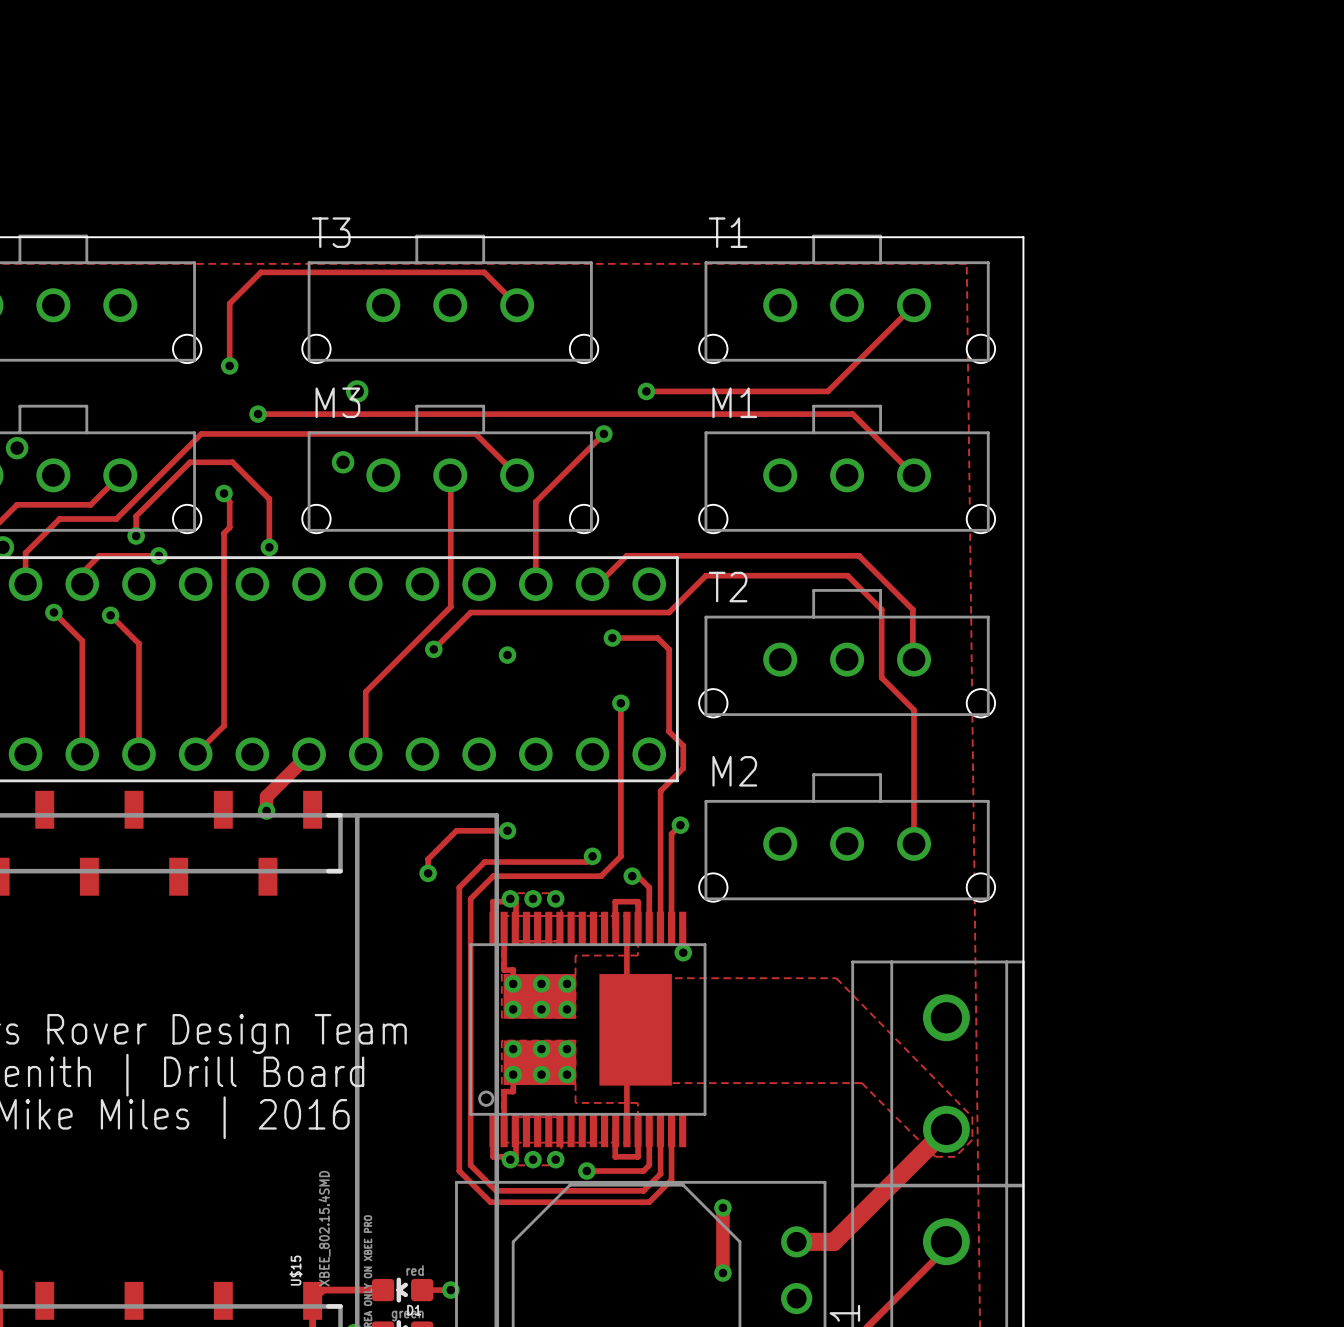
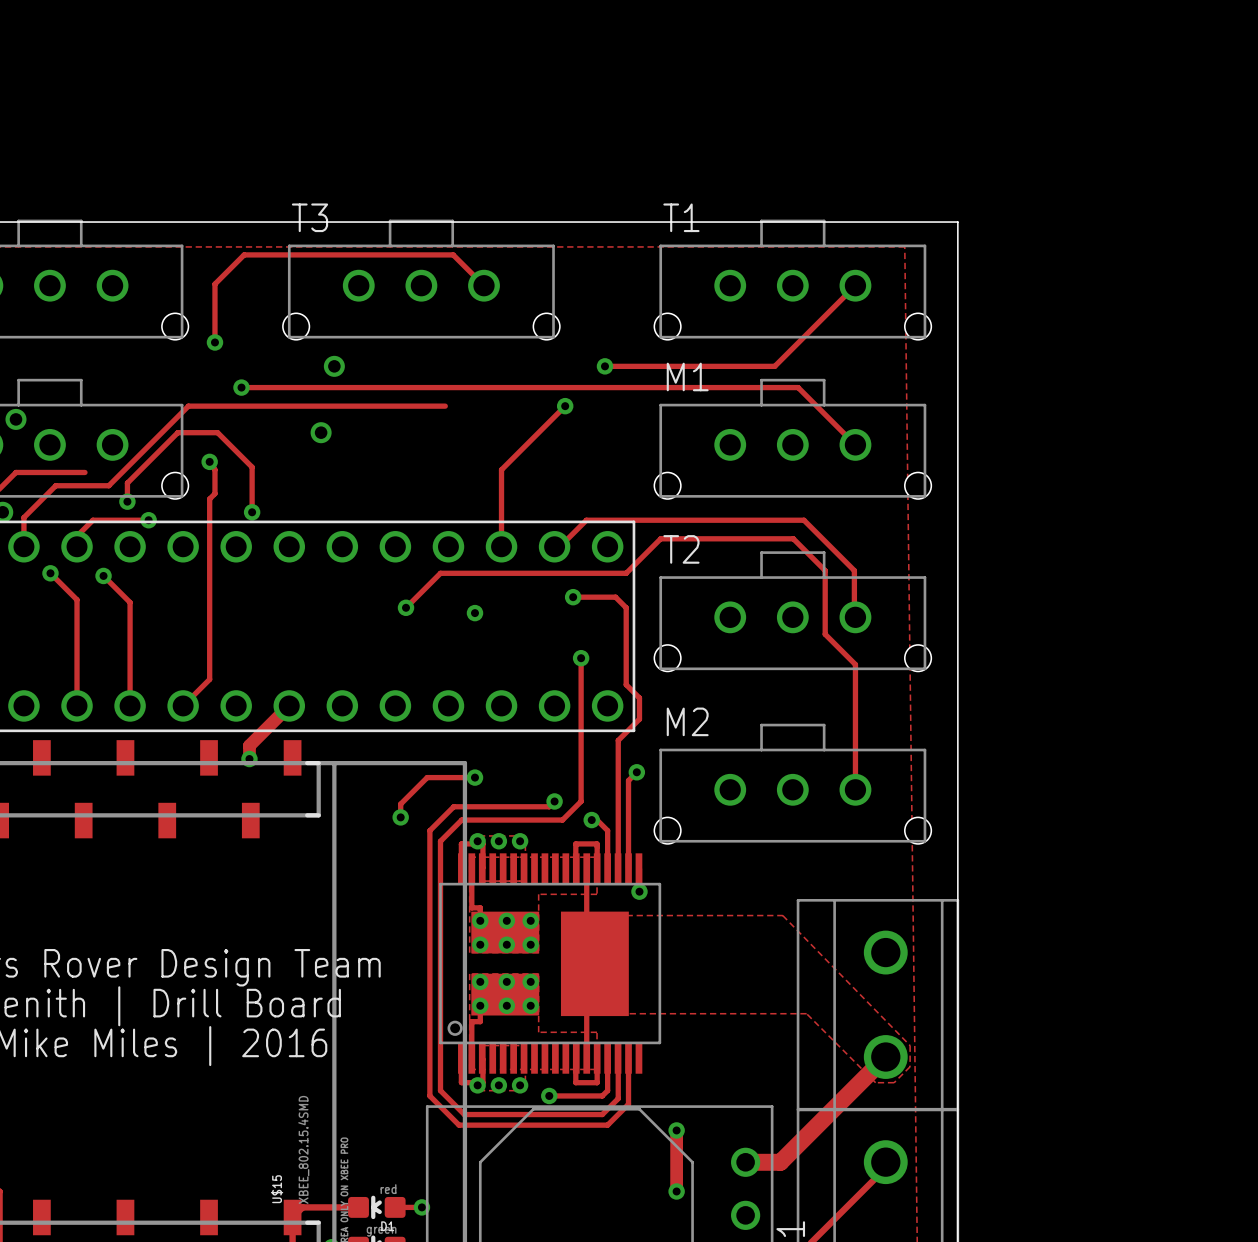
track: (475, 433) (517, 475) -> none
M3: (450, 468) -> none
track: (120, 475) (90, 504) -> none
track: (450, 475) (450, 606) (365, 691) (365, 754) -> none

